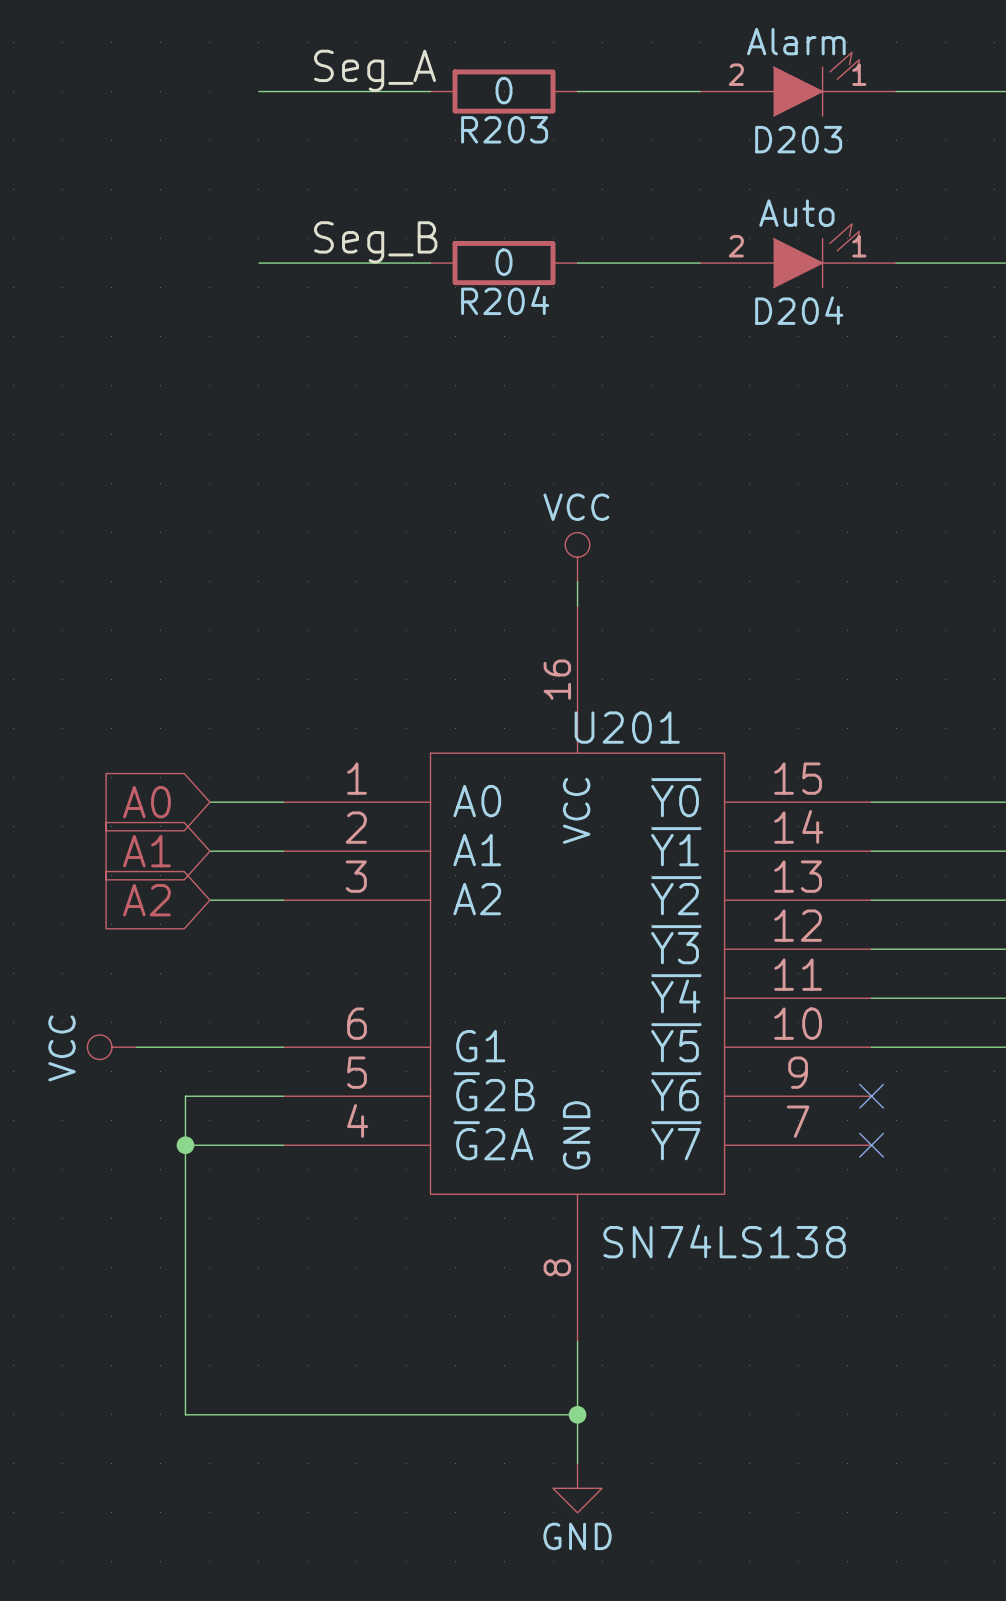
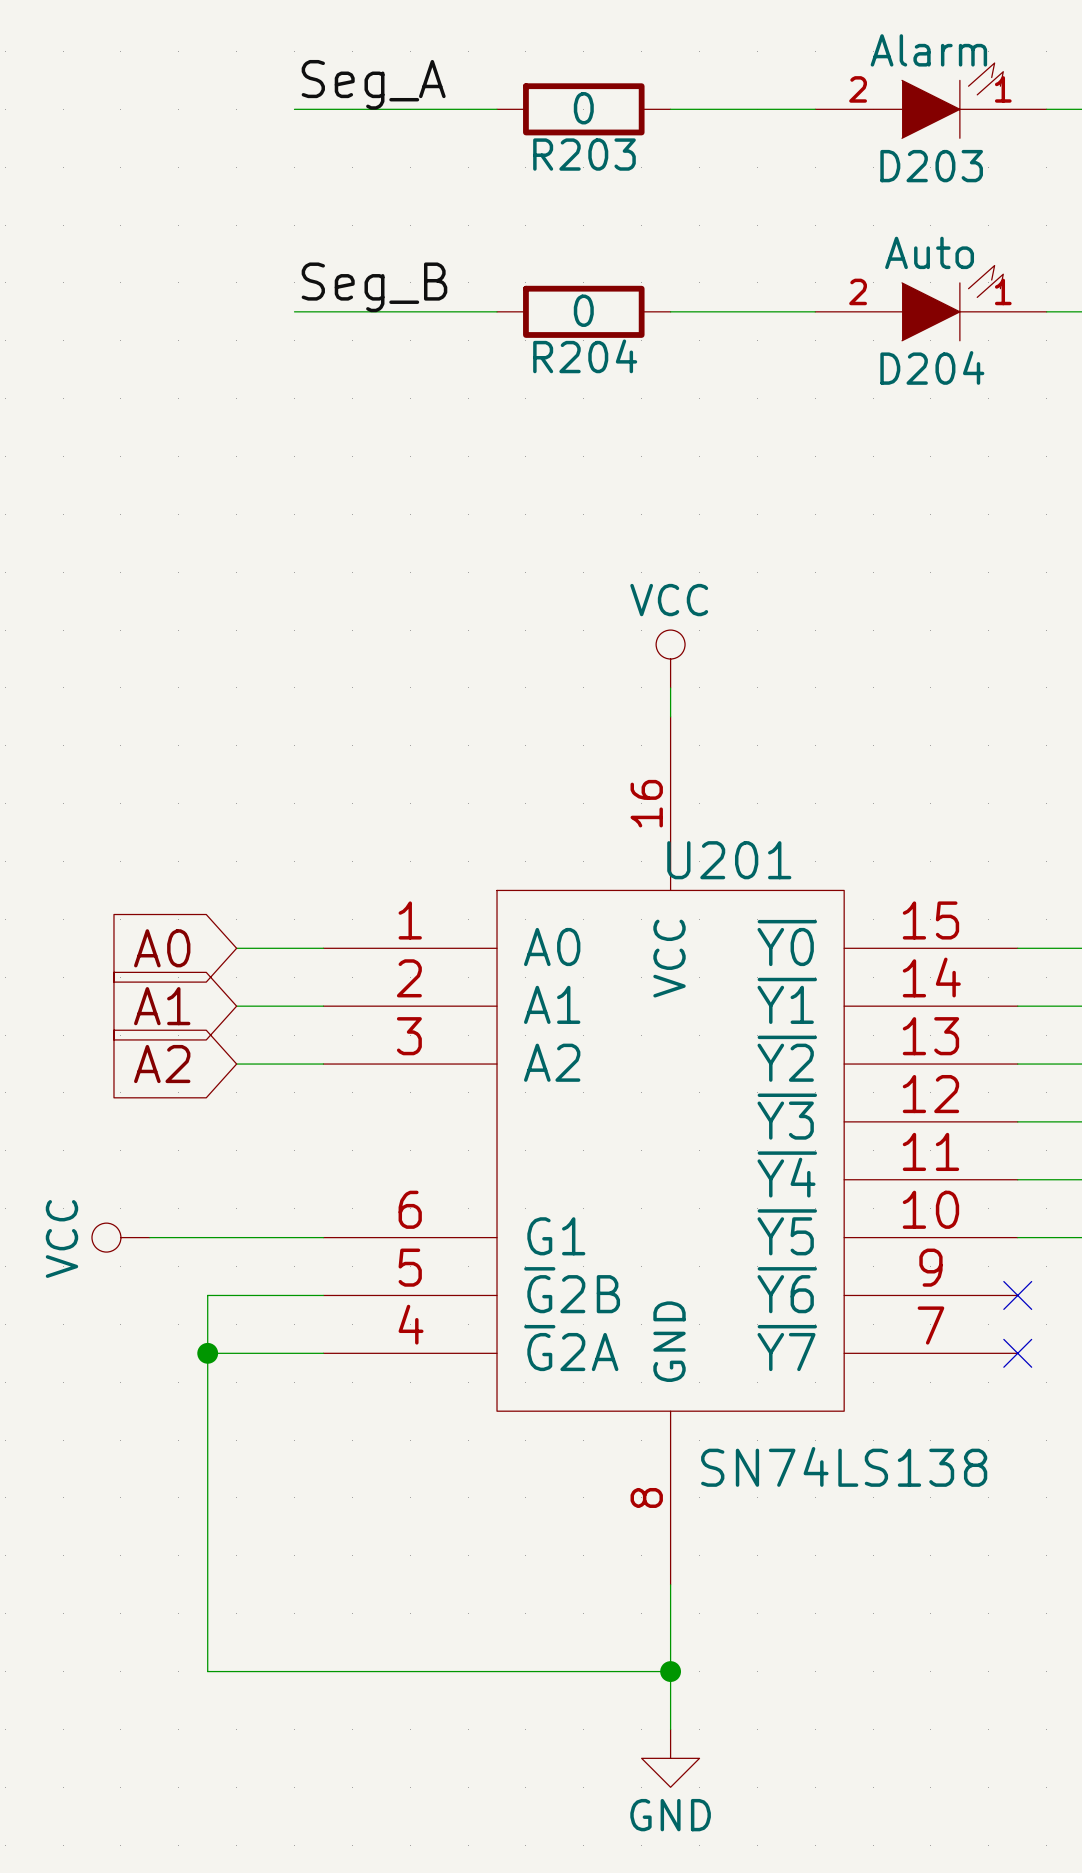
label position: Seg_A (375, 70) -> Seg_A (373, 84)
label position: Seg_B (375, 242) -> Seg_B (374, 287)

